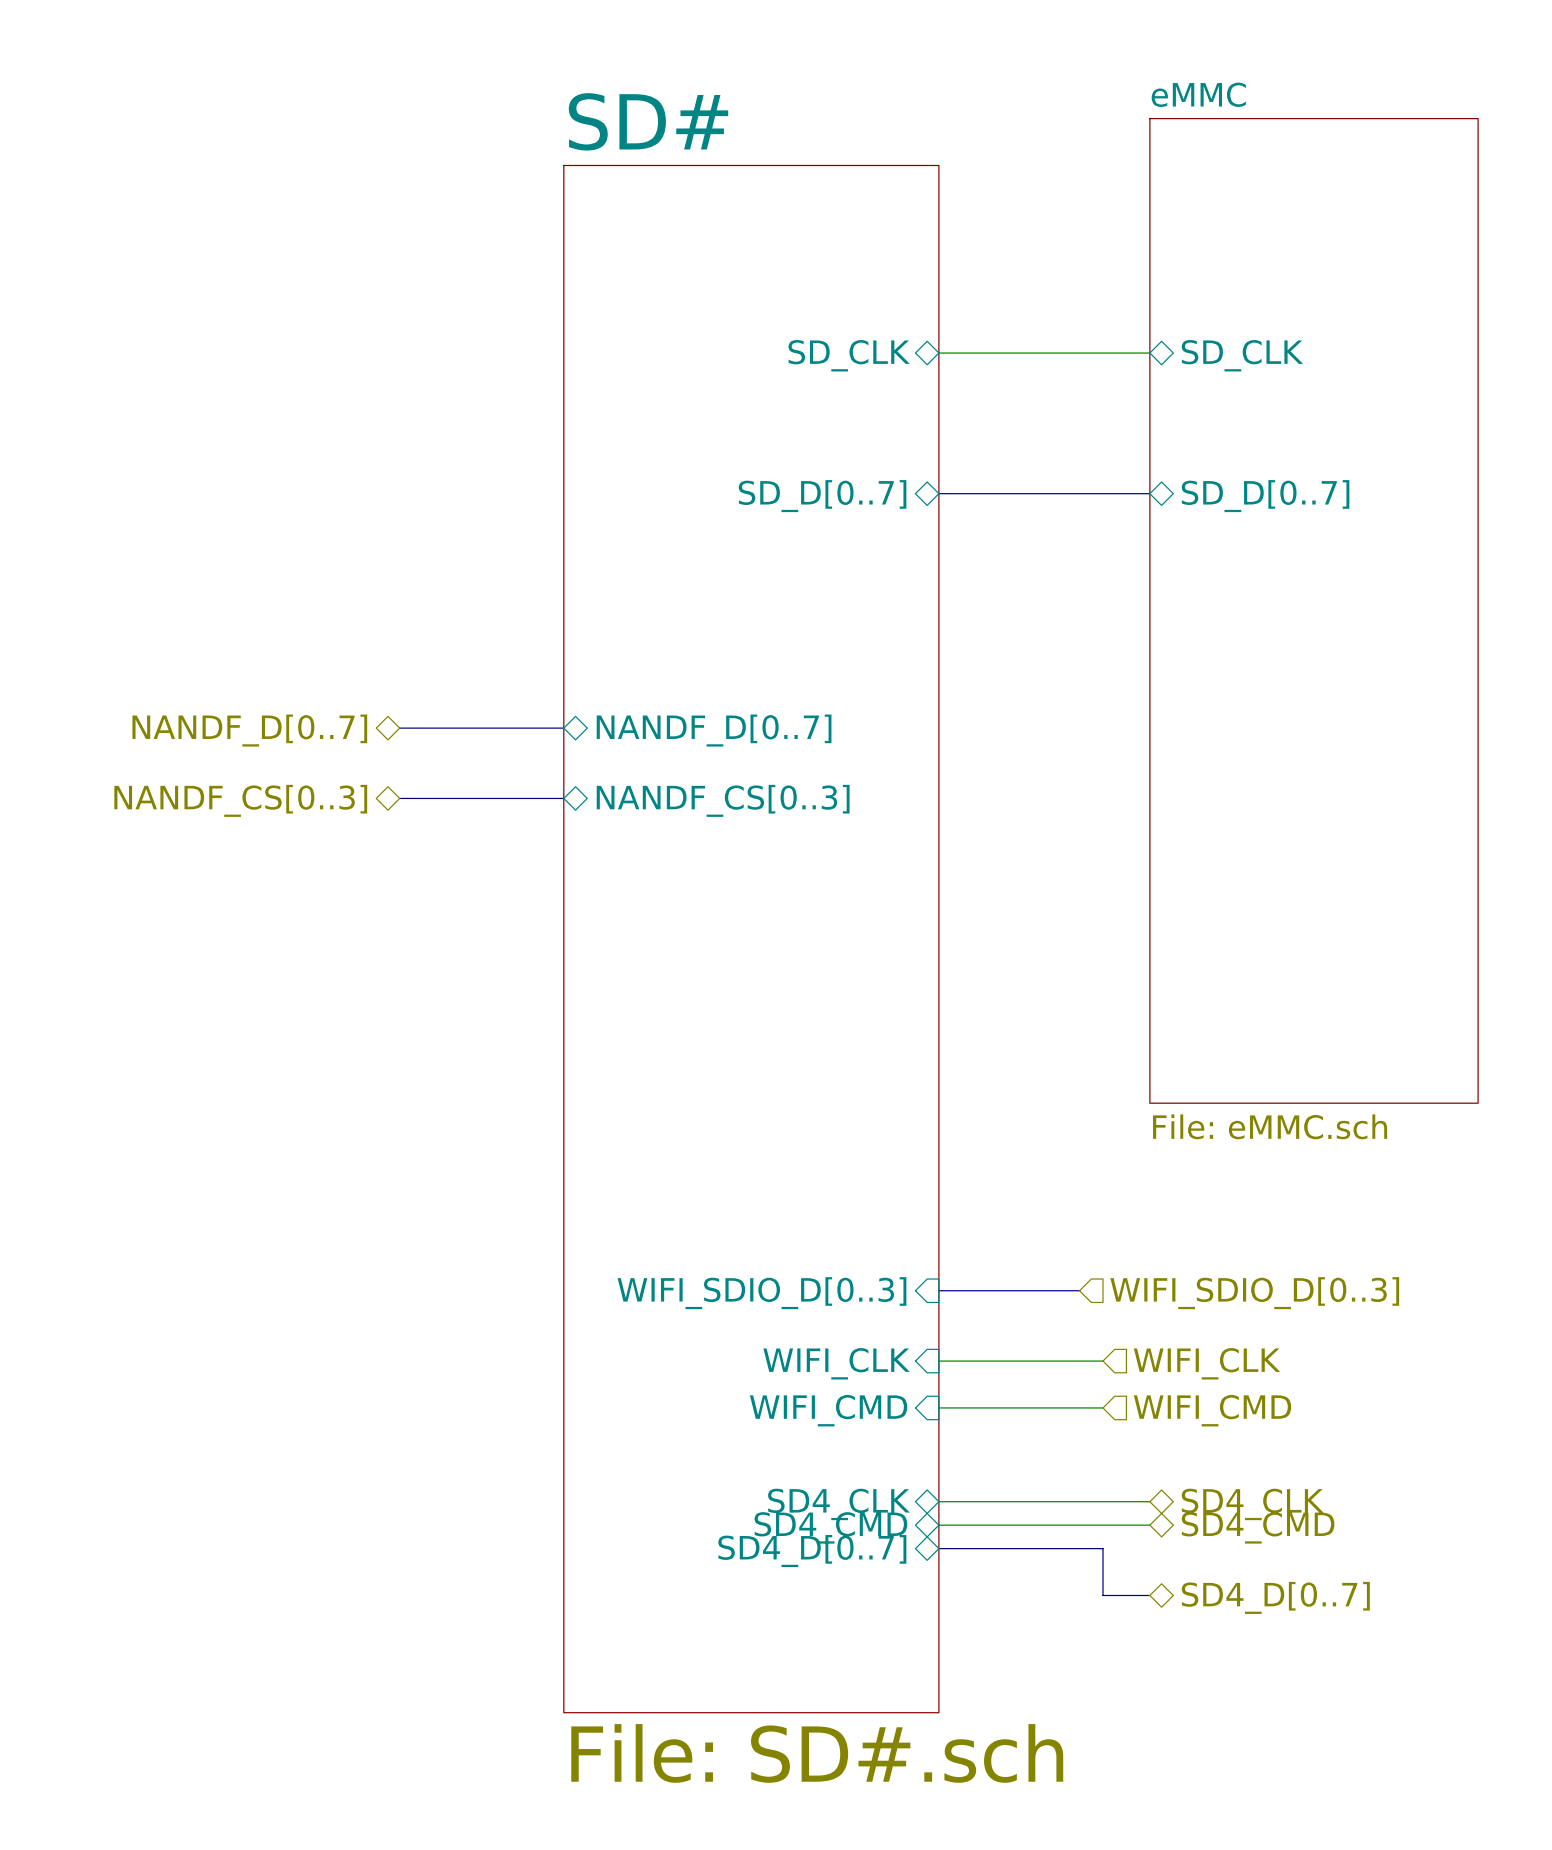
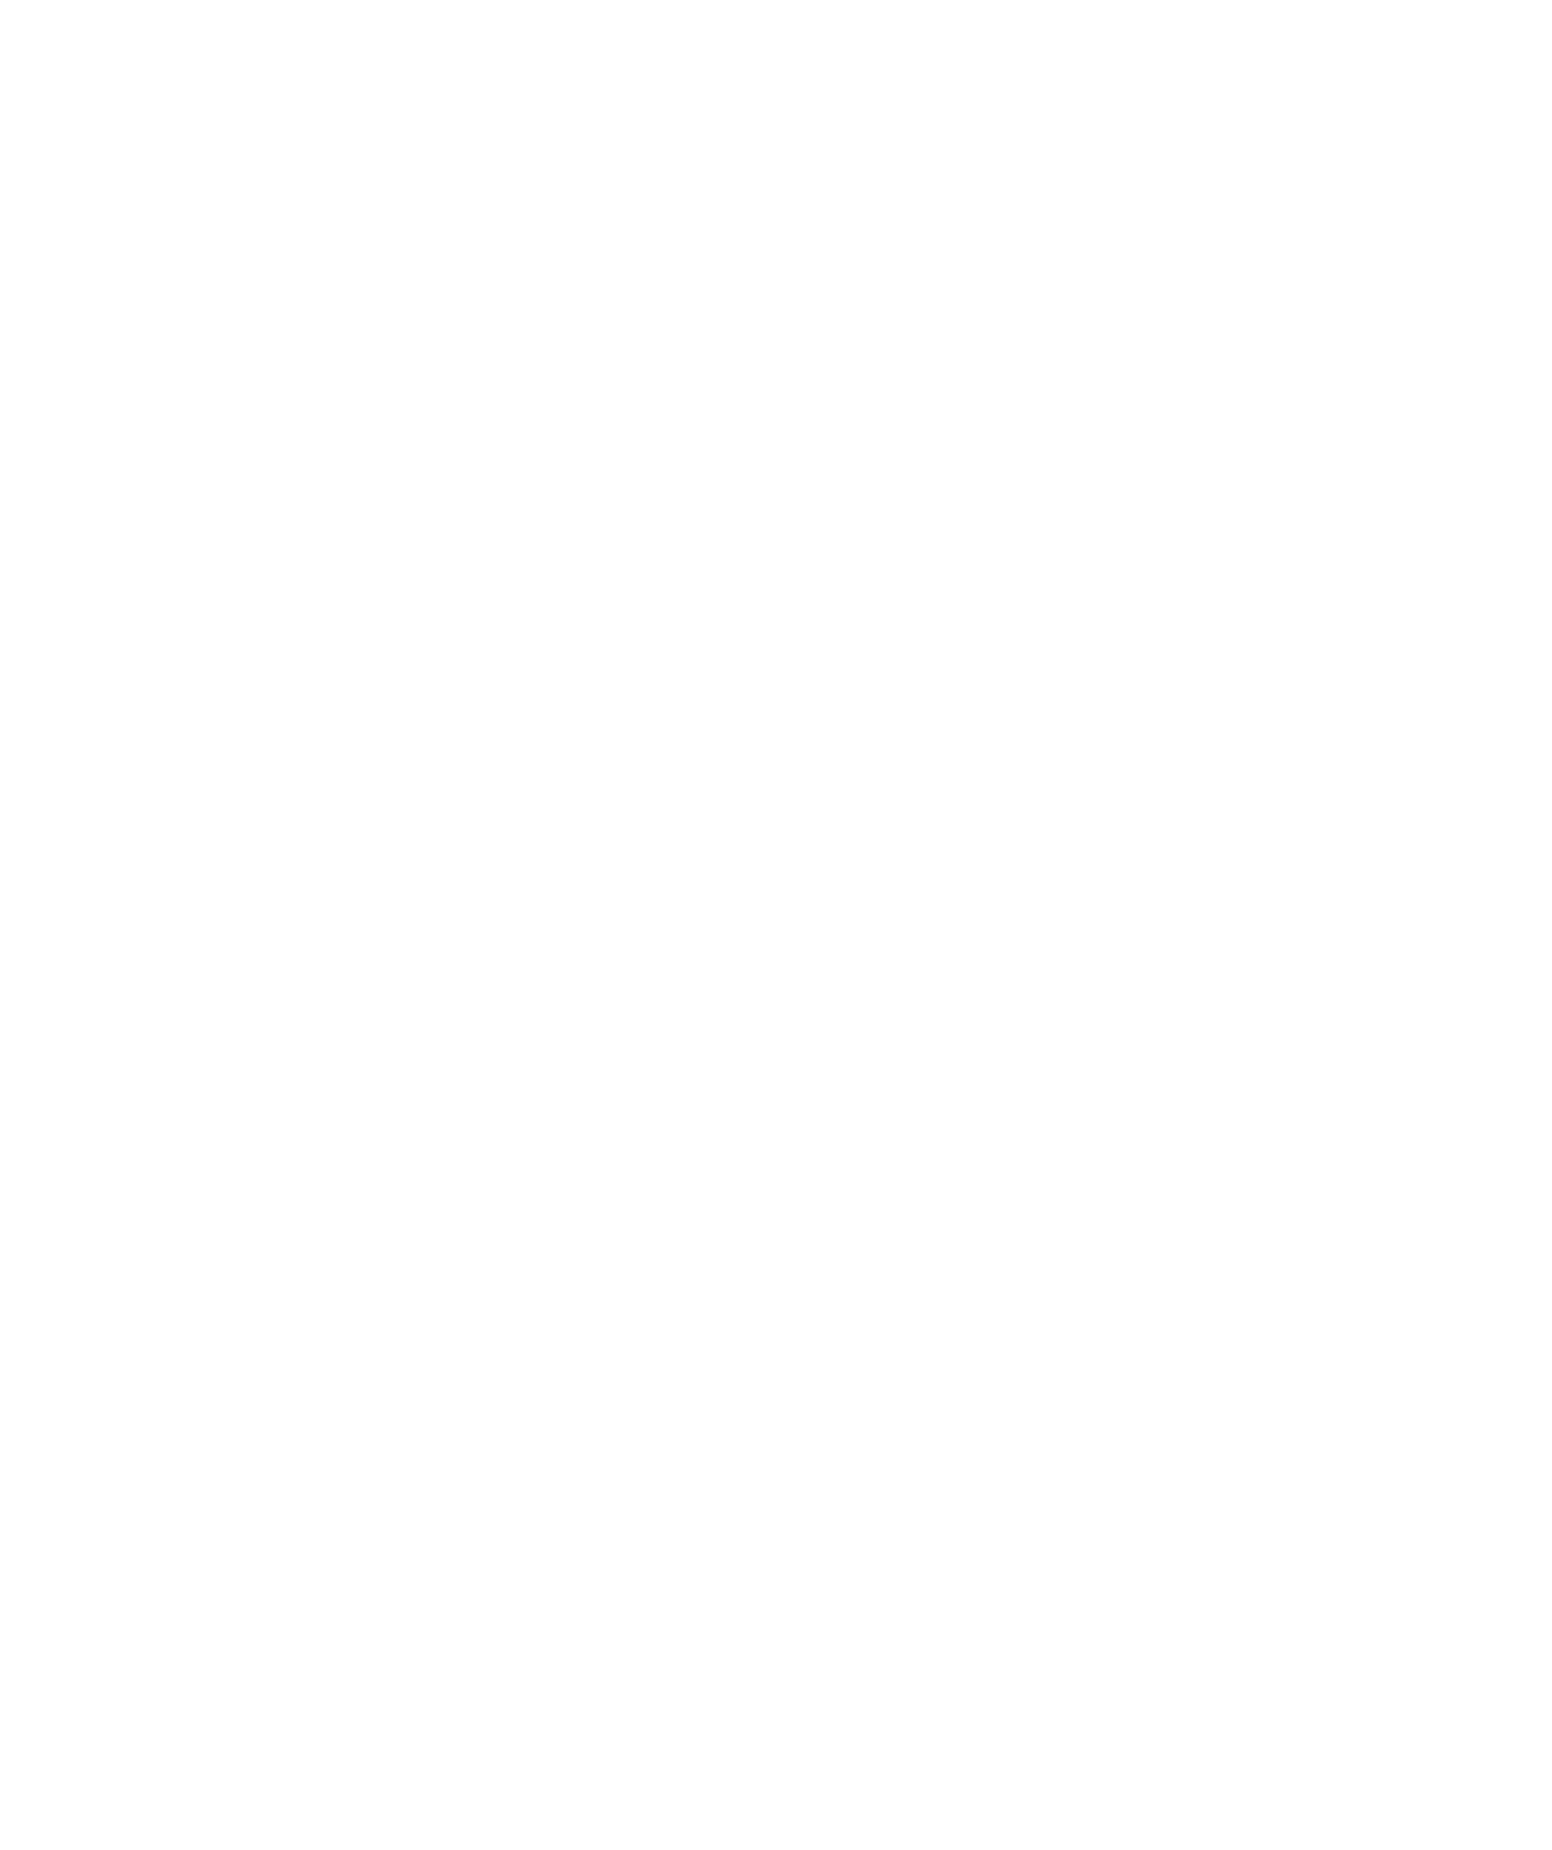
wire: (938, 353) (1149, 353) -> none
sheet pin: SD_CLK (849, 355) -> none
sheet pin: SD_CLK (1242, 355) -> none
bus: (938, 493) (1149, 493) -> none
sheet pin: SD_D[0..7] (822, 496) -> none
sheet pin: SD_D[0..7] (1265, 496) -> none
sheet eMMC: File: eMMC.sch (1313, 610) -> none
bus: (399, 728) (563, 728) -> none
hierarchical label: NANDF_D[0..7] (249, 730) -> none
sheet pin: NANDF_D[0..7] (714, 730) -> none
bus: (399, 798) (563, 798) -> none
hierarchical label: NANDF_CS[0..3] (240, 800) -> none
sheet pin: NANDF_CS[0..3] (723, 800) -> none
sheet SD#: File: SD#.sch (751, 939) -> none
bus: (938, 1290) (1079, 1290) -> none
sheet pin: WIFI_SDIO_D[0..3] (761, 1293) -> none
hierarchical label: WIFI_SDIO_D[0..3] (1254, 1293) -> none
wire: (938, 1361) (1102, 1361) -> none
sheet pin: WIFI_CLK (836, 1363) -> none
hierarchical label: WIFI_CLK (1207, 1363) -> none
wire: (938, 1407) (1102, 1407) -> none
sheet pin: WIFI_CMD (828, 1410) -> none
hierarchical label: WIFI_CMD (1212, 1410) -> none
wire: (938, 1501) (1149, 1501) -> none
sheet pin: SD4_CLK (838, 1504) -> none
hierarchical label: SD4_CLK (1252, 1504) -> none
wire: (938, 1525) (1149, 1525) -> none
sheet pin: SD4_CMD (830, 1527) -> none
hierarchical label: SD4_CMD (1258, 1527) -> none
bus: (938, 1548) (1102, 1548) (1102, 1595) (1149, 1595) -> none
sheet pin: SD4_D[0..7] (812, 1551) -> none
hierarchical label: SD4_D[0..7] (1275, 1597) -> none

